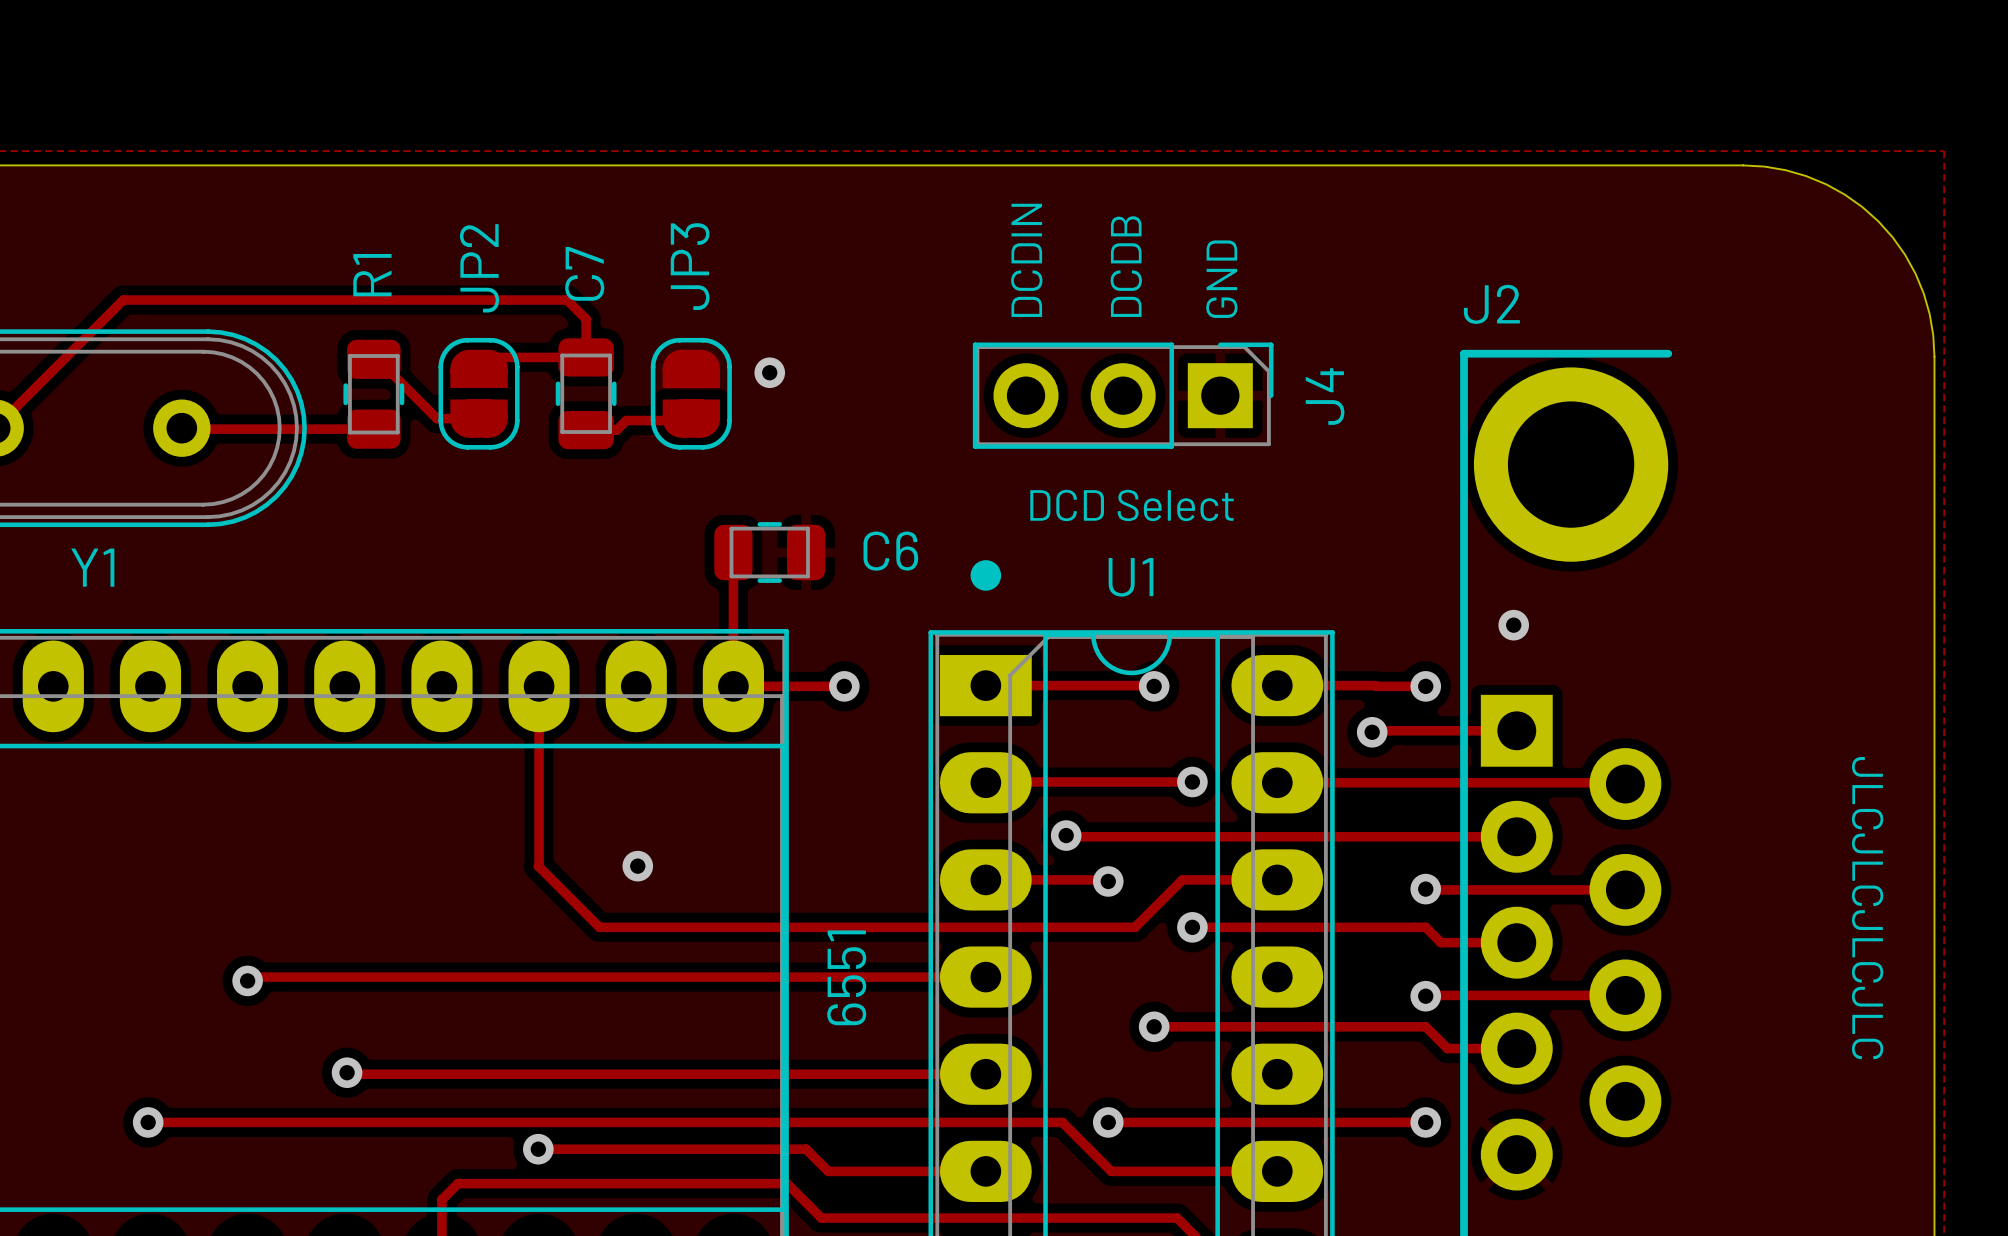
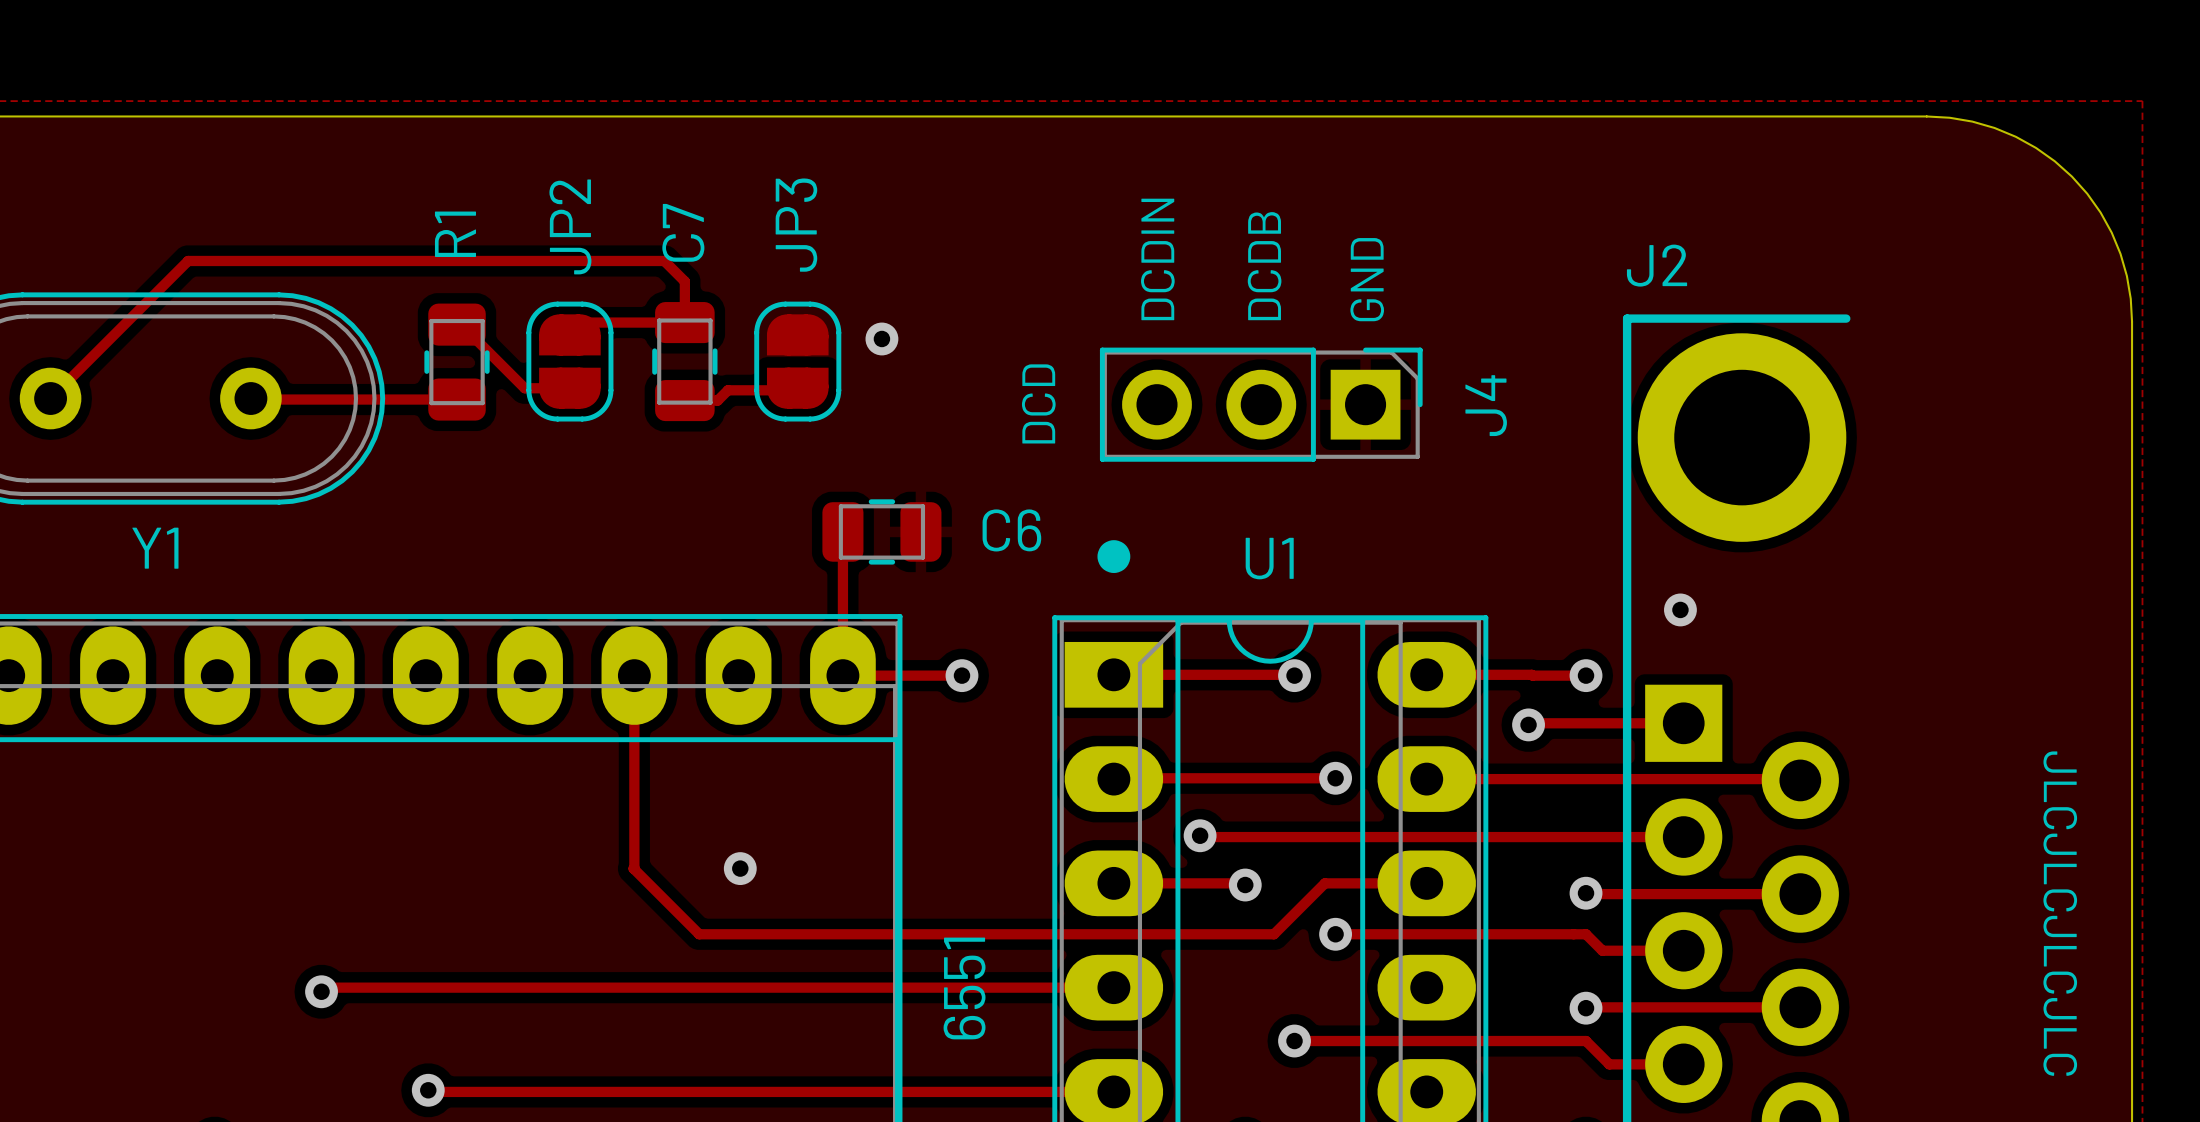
text position: DCDIN (1026, 260) -> DCDIN (1157, 259)
text position: DCDB (1126, 266) -> DCDB (1264, 266)
text position: GND (1221, 279) -> GND (1367, 279)
J4 position: (1123, 395) -> (1261, 404)
J4 name position: J4 (1325, 396) -> J4 (1486, 405)
J4 value: DCD Select (1132, 505) -> DCD (1038, 403)

